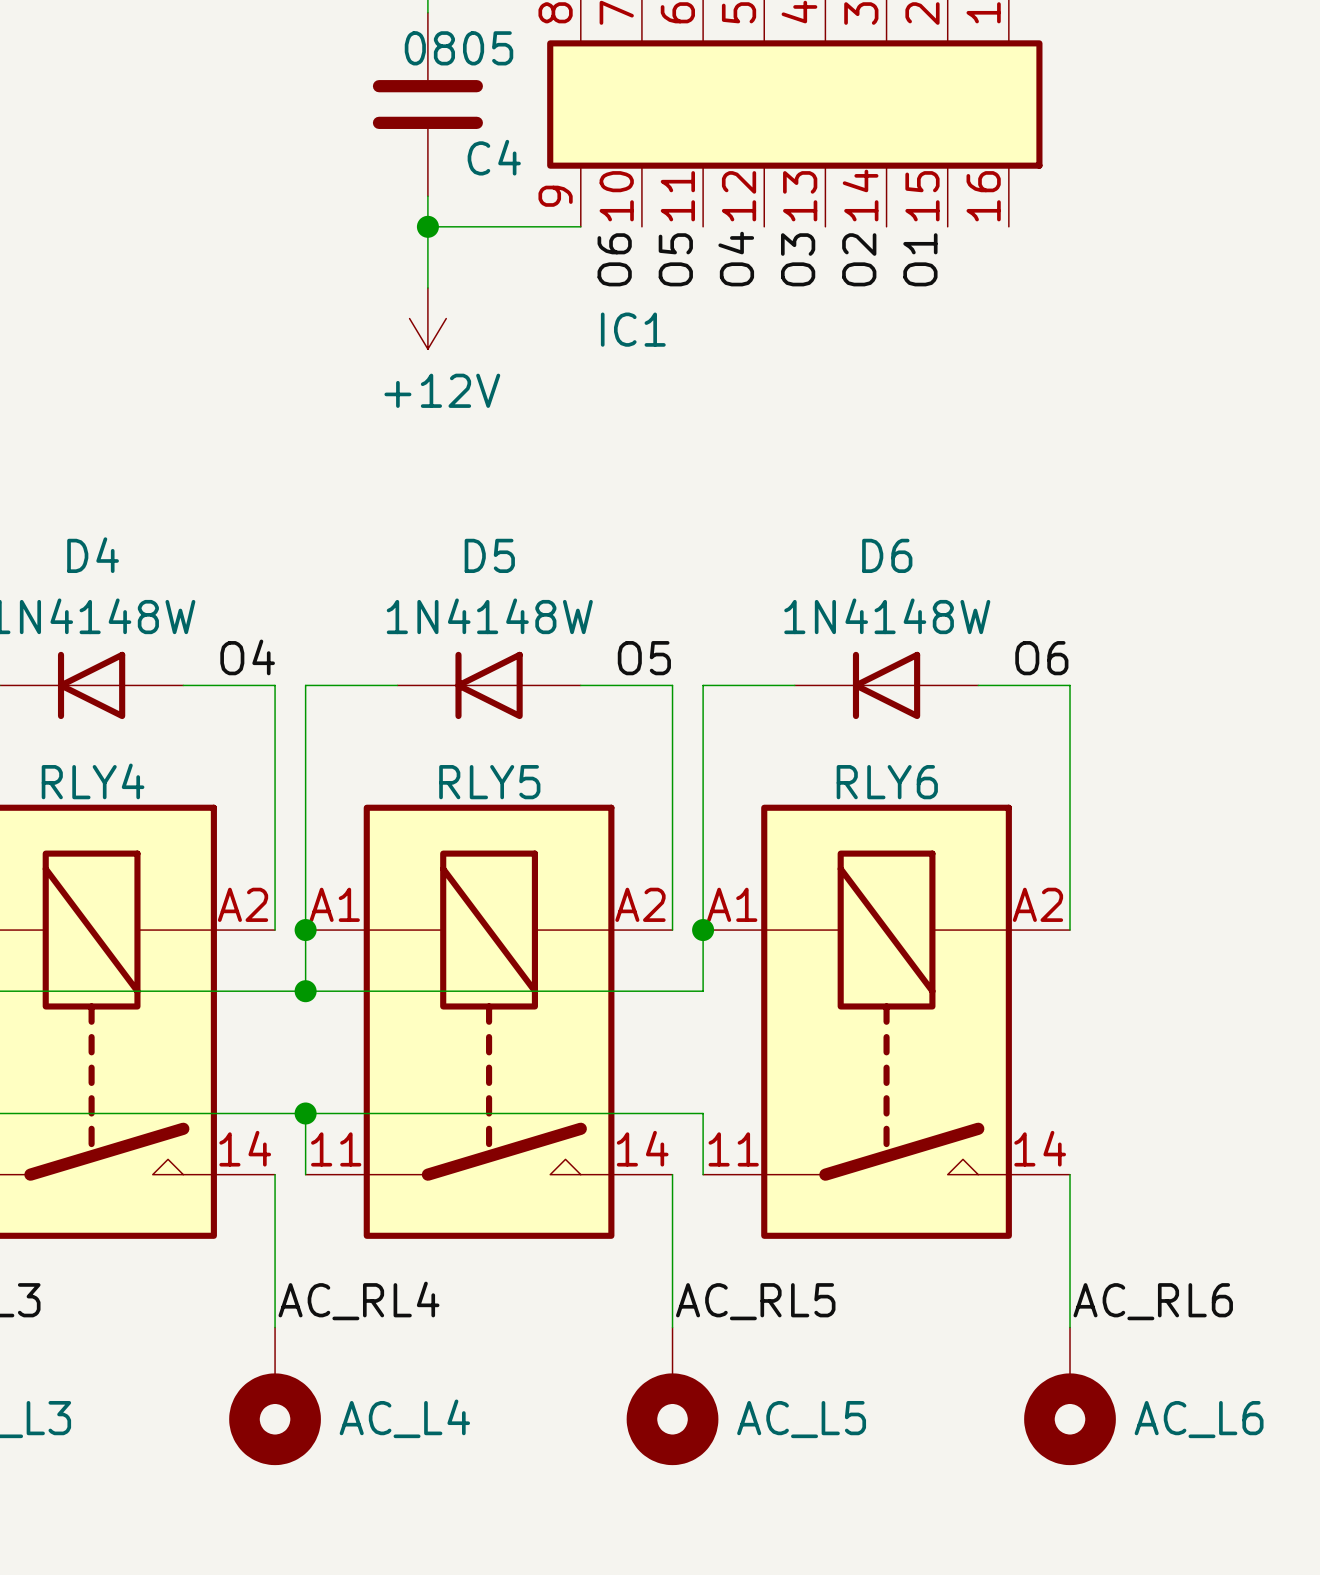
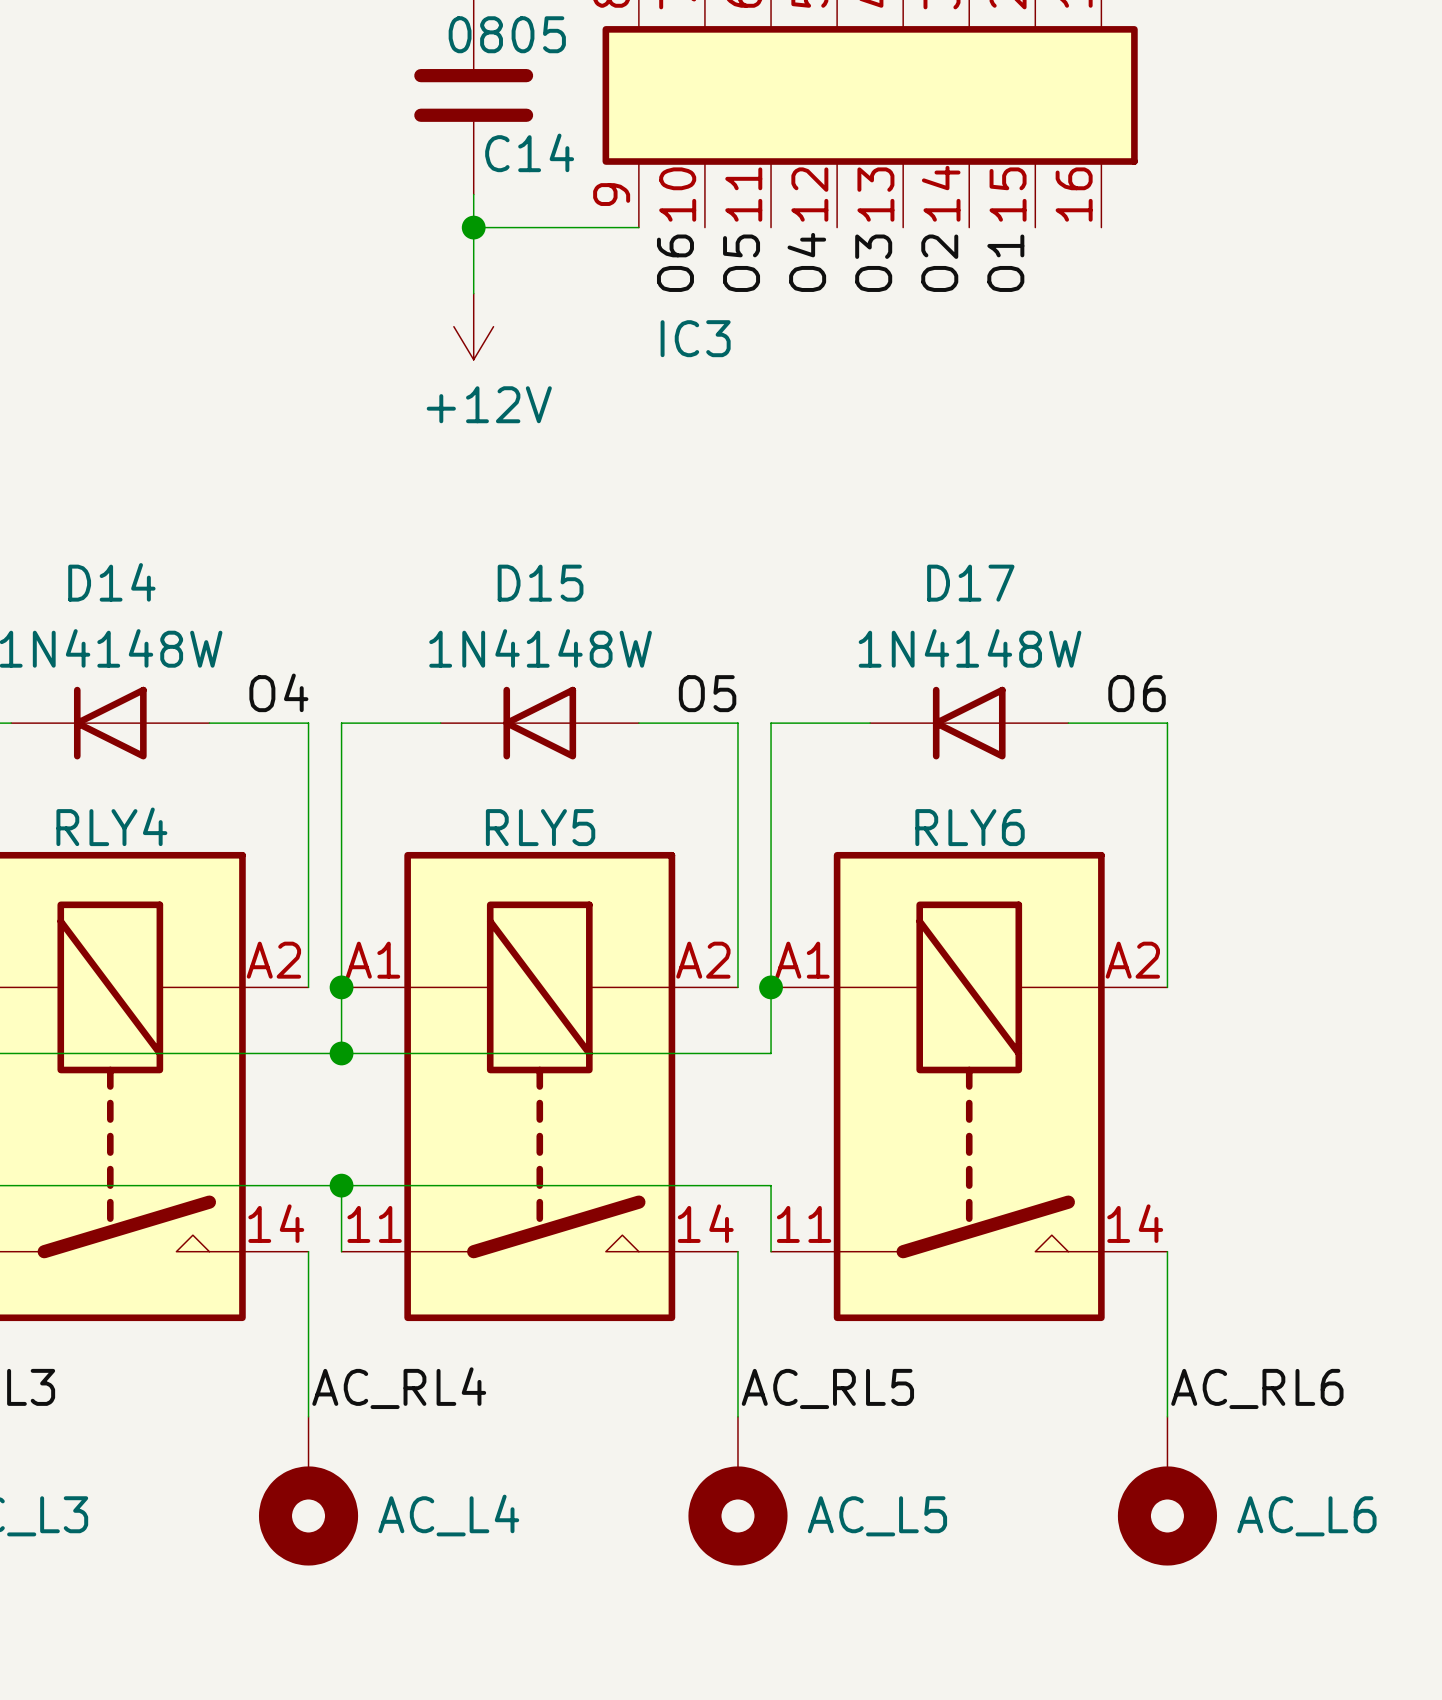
C4 name: C4 (494, 157) -> C14 (529, 152)
IC1 name: IC1 (633, 329) -> IC3 (695, 338)
D4 name: D4 (93, 555) -> D14 (111, 582)
D5 name: D5 (489, 555) -> D15 (540, 583)
D6 name: D6 (887, 555) -> D17 (970, 583)

